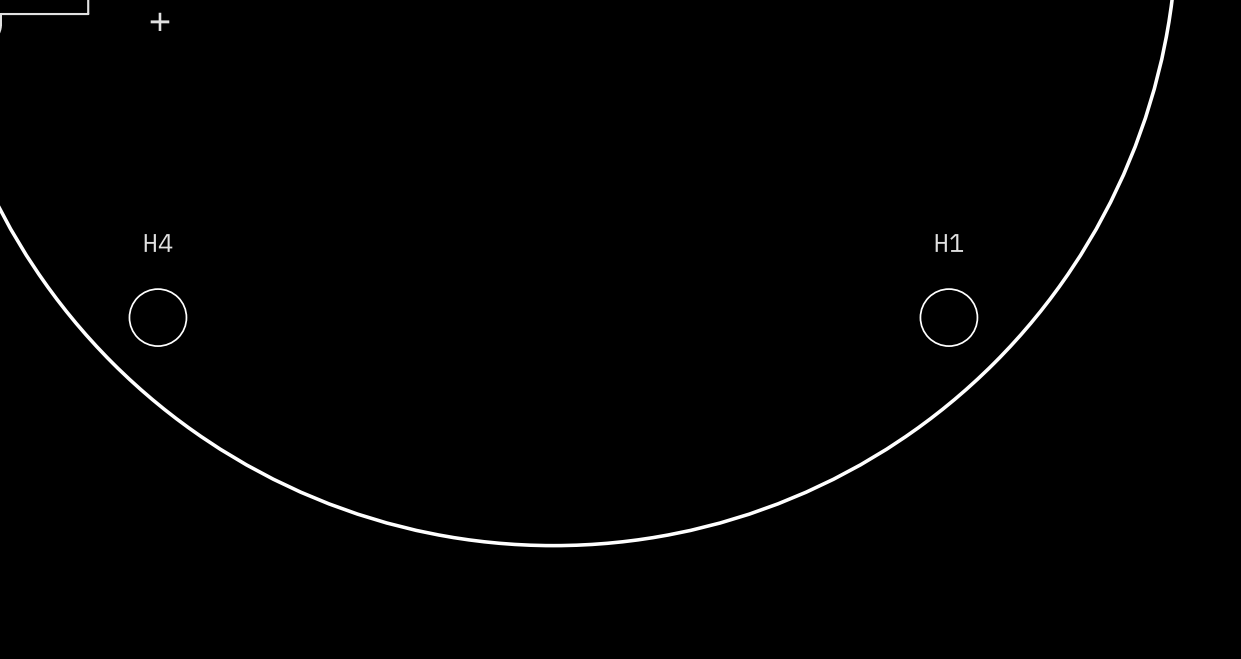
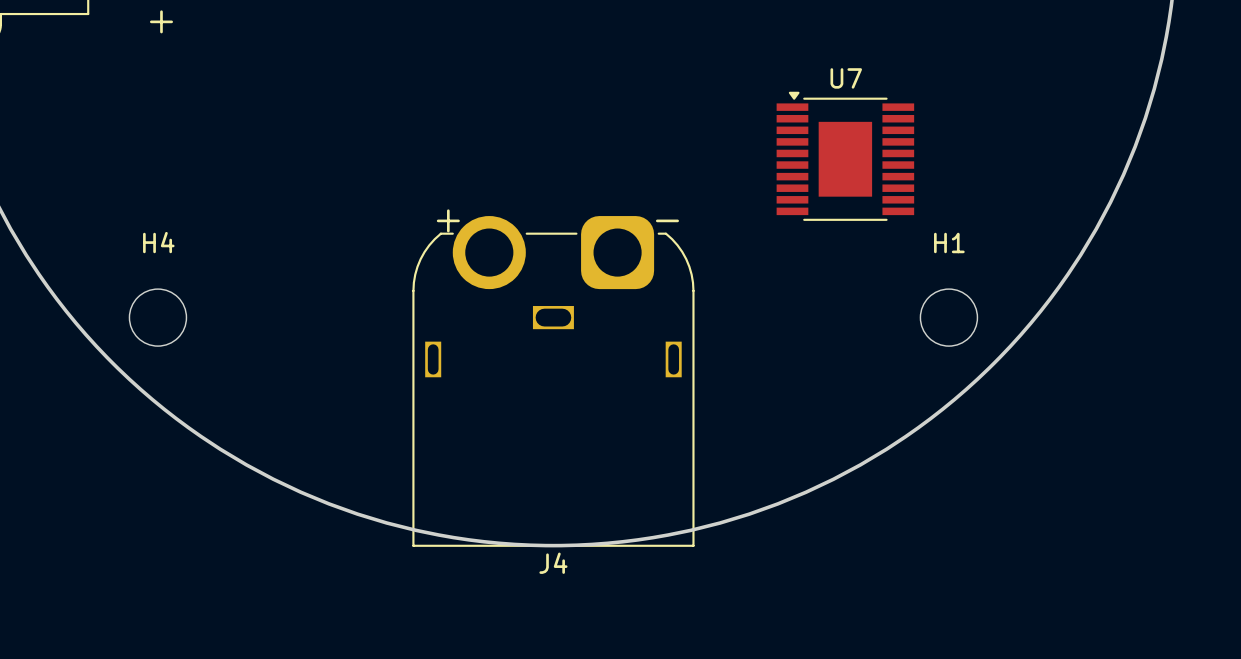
U7: none -> (845, 156)
J4: none -> (553, 381)

